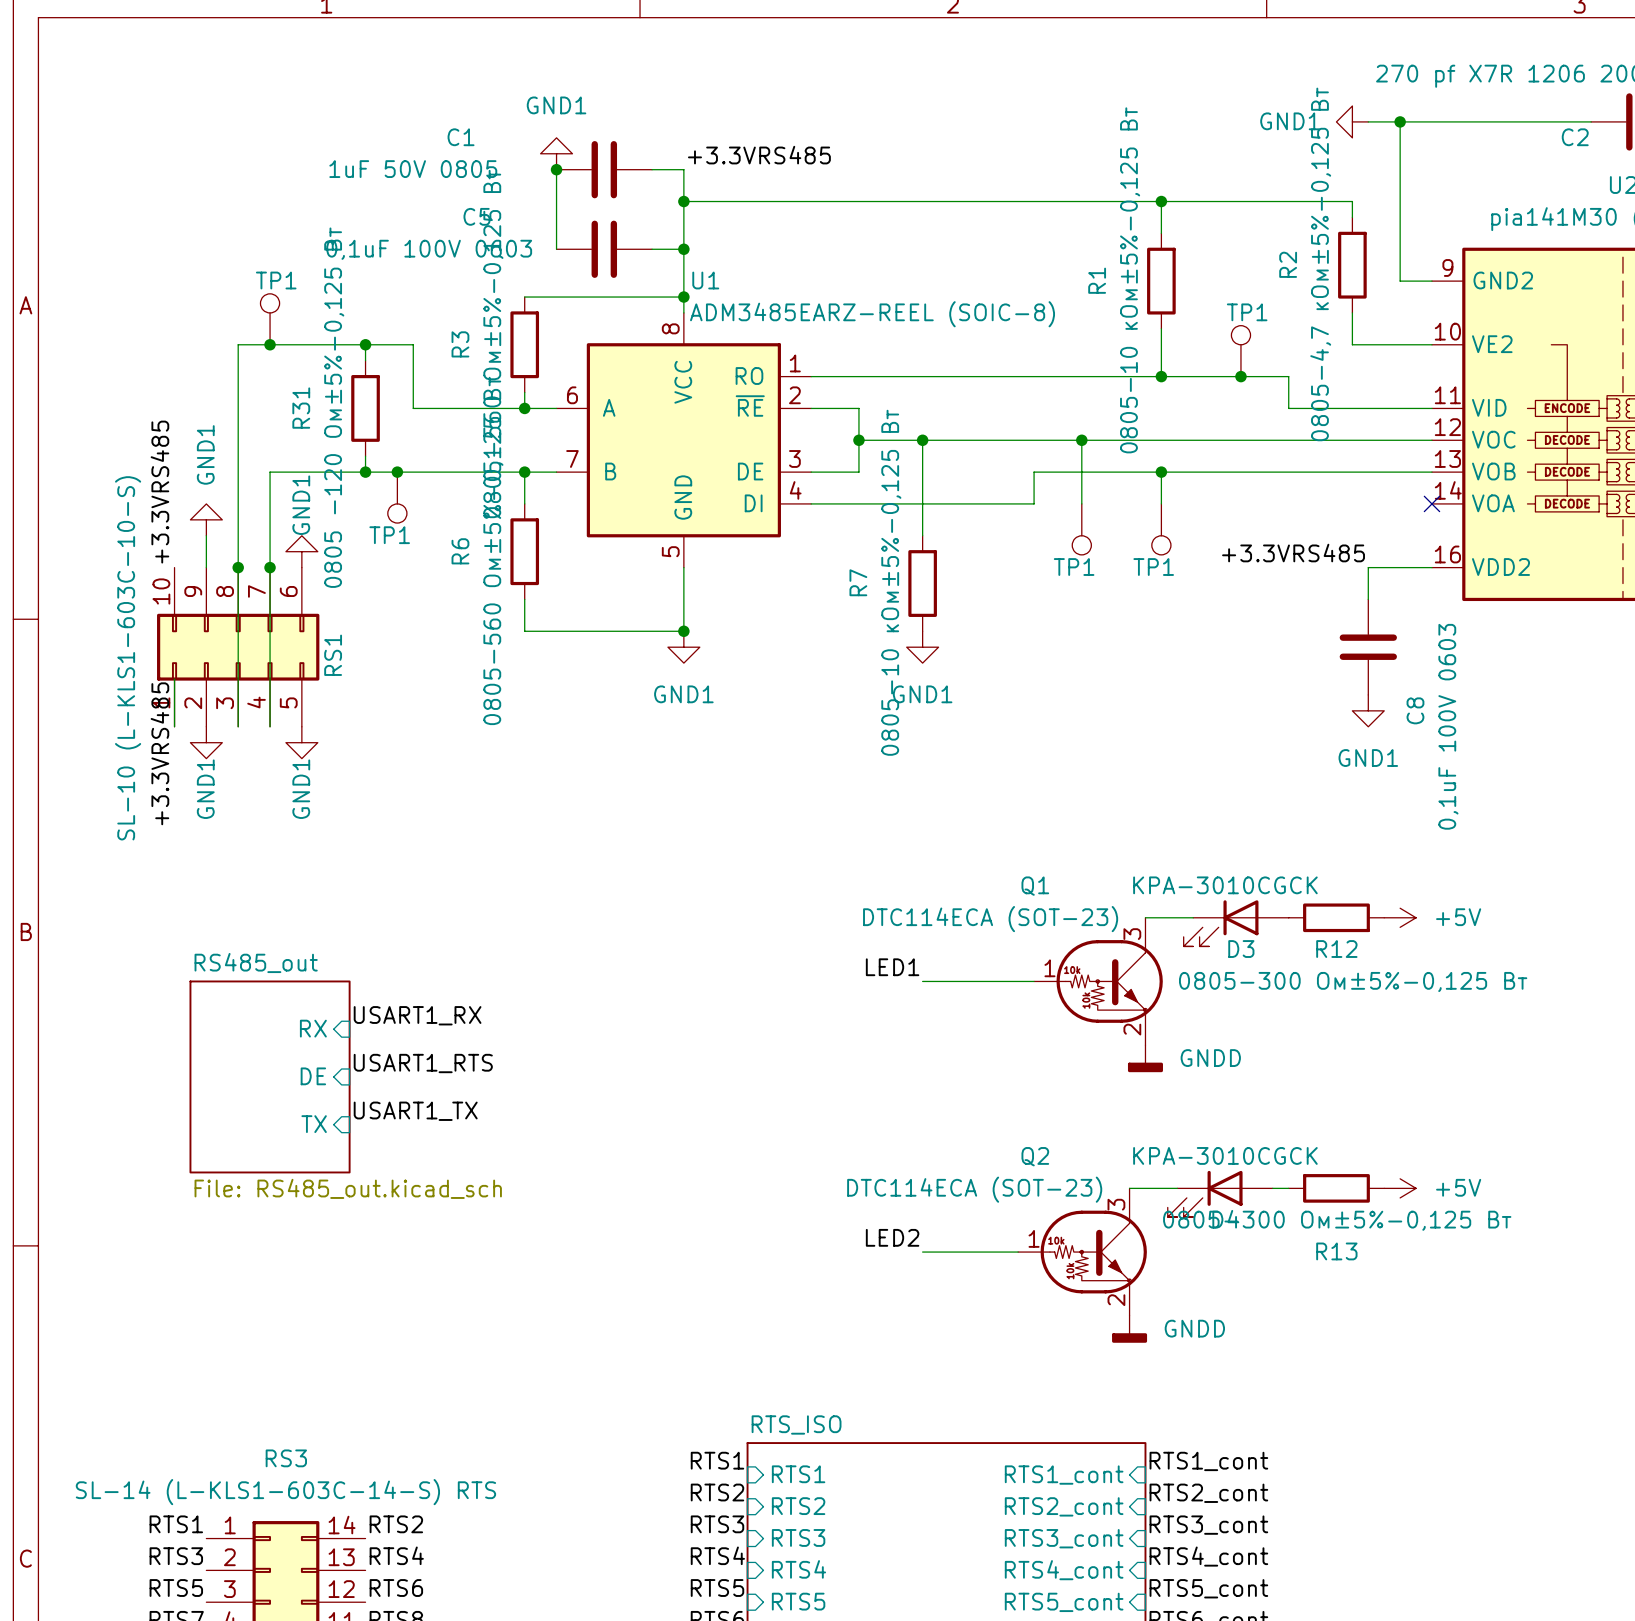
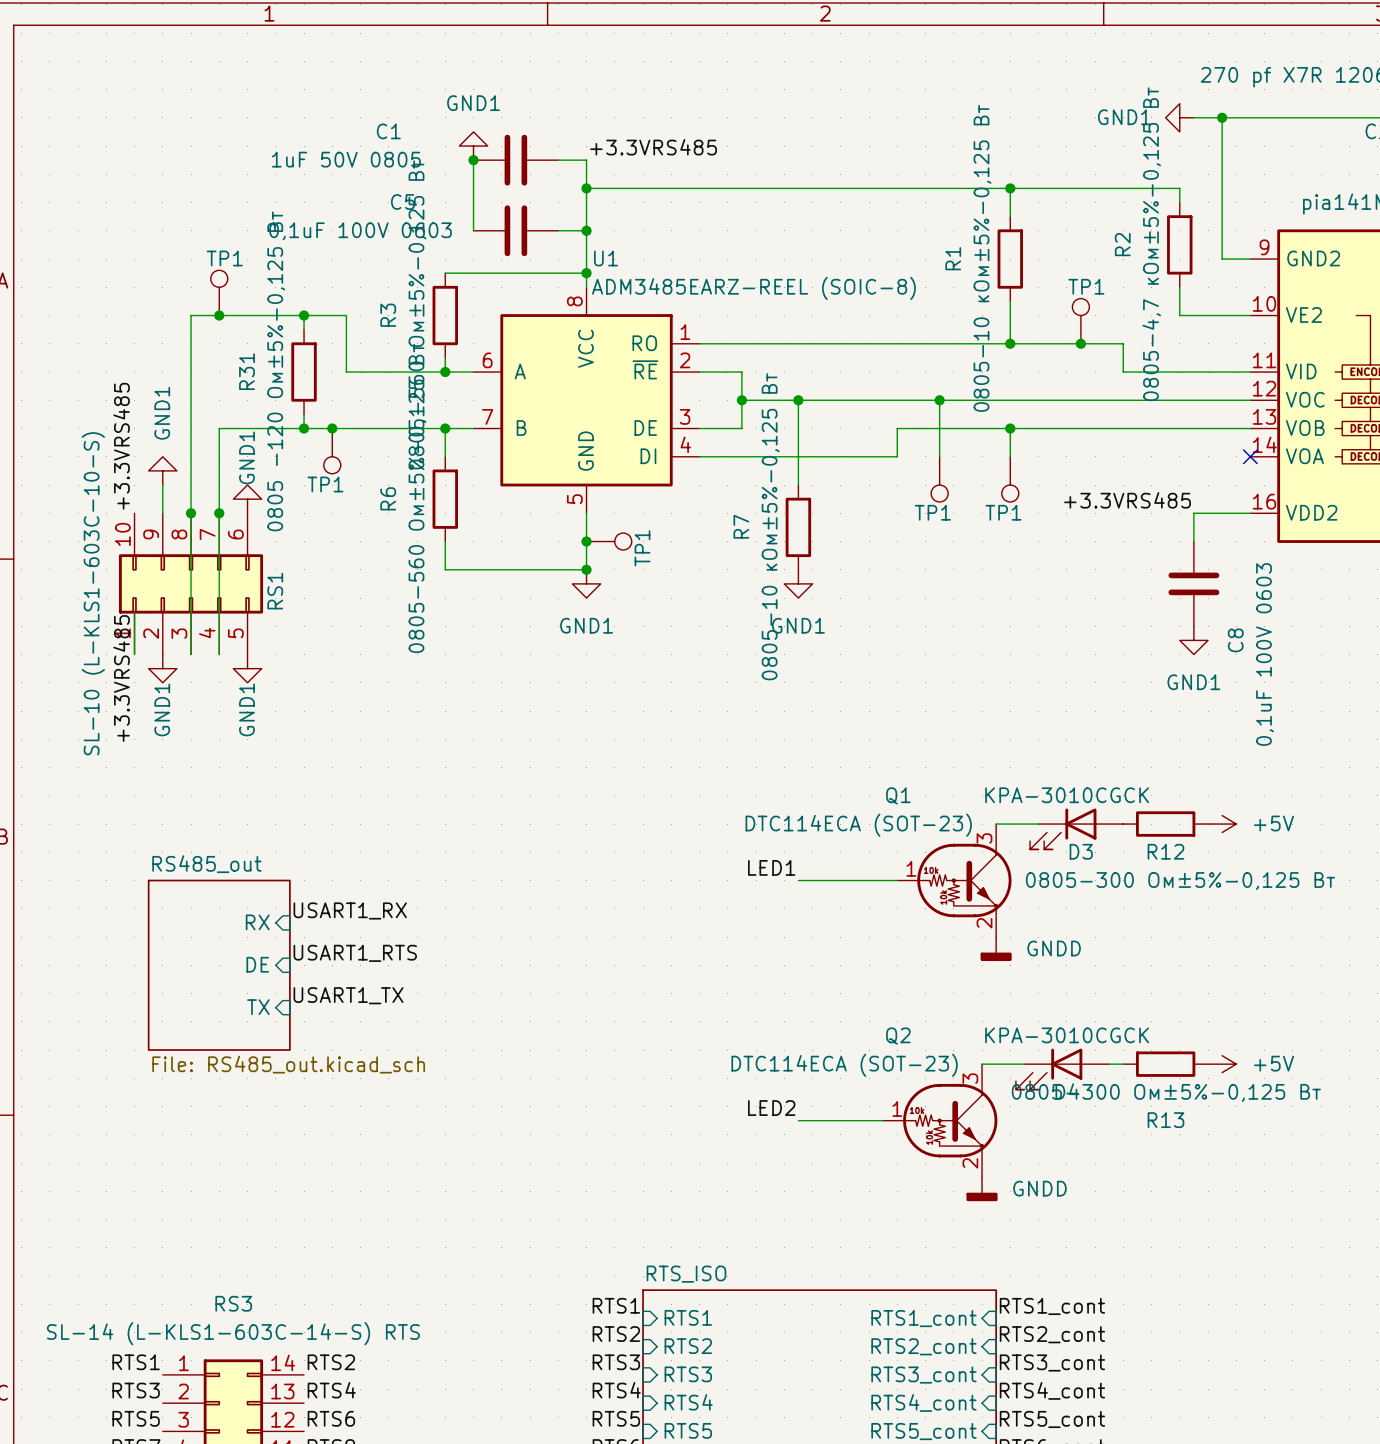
junction: none -> (586, 541)
TP1: none -> (609, 541)

